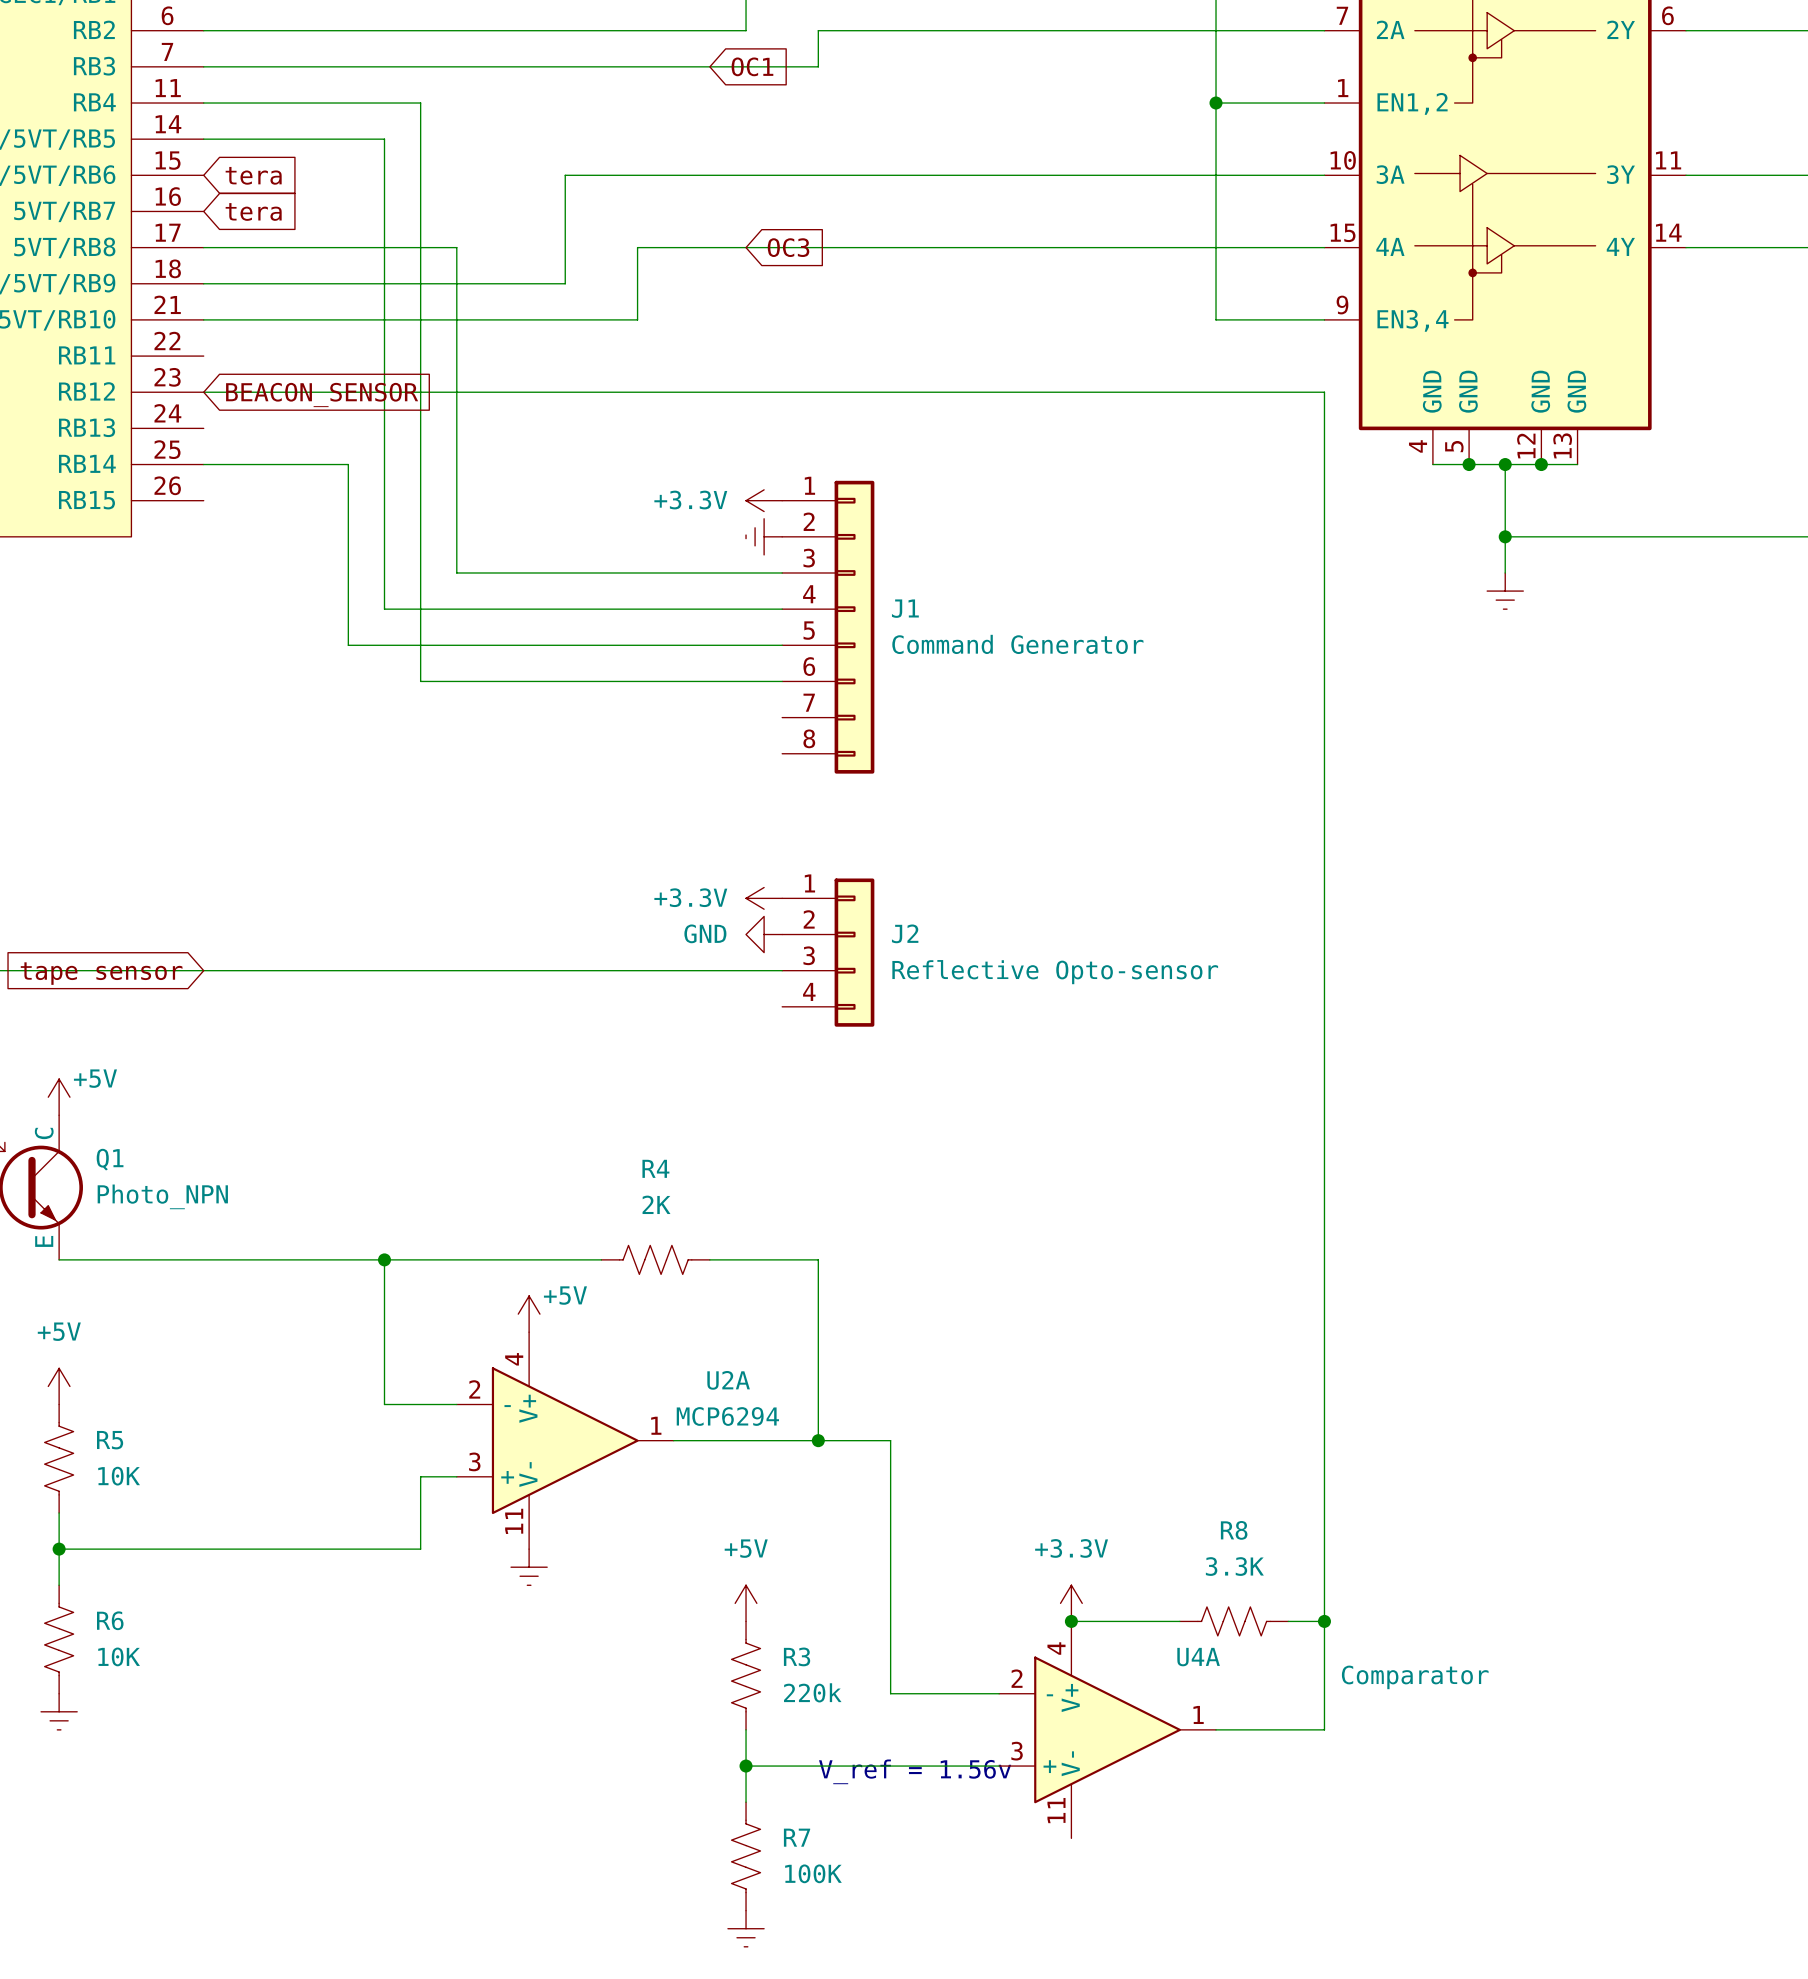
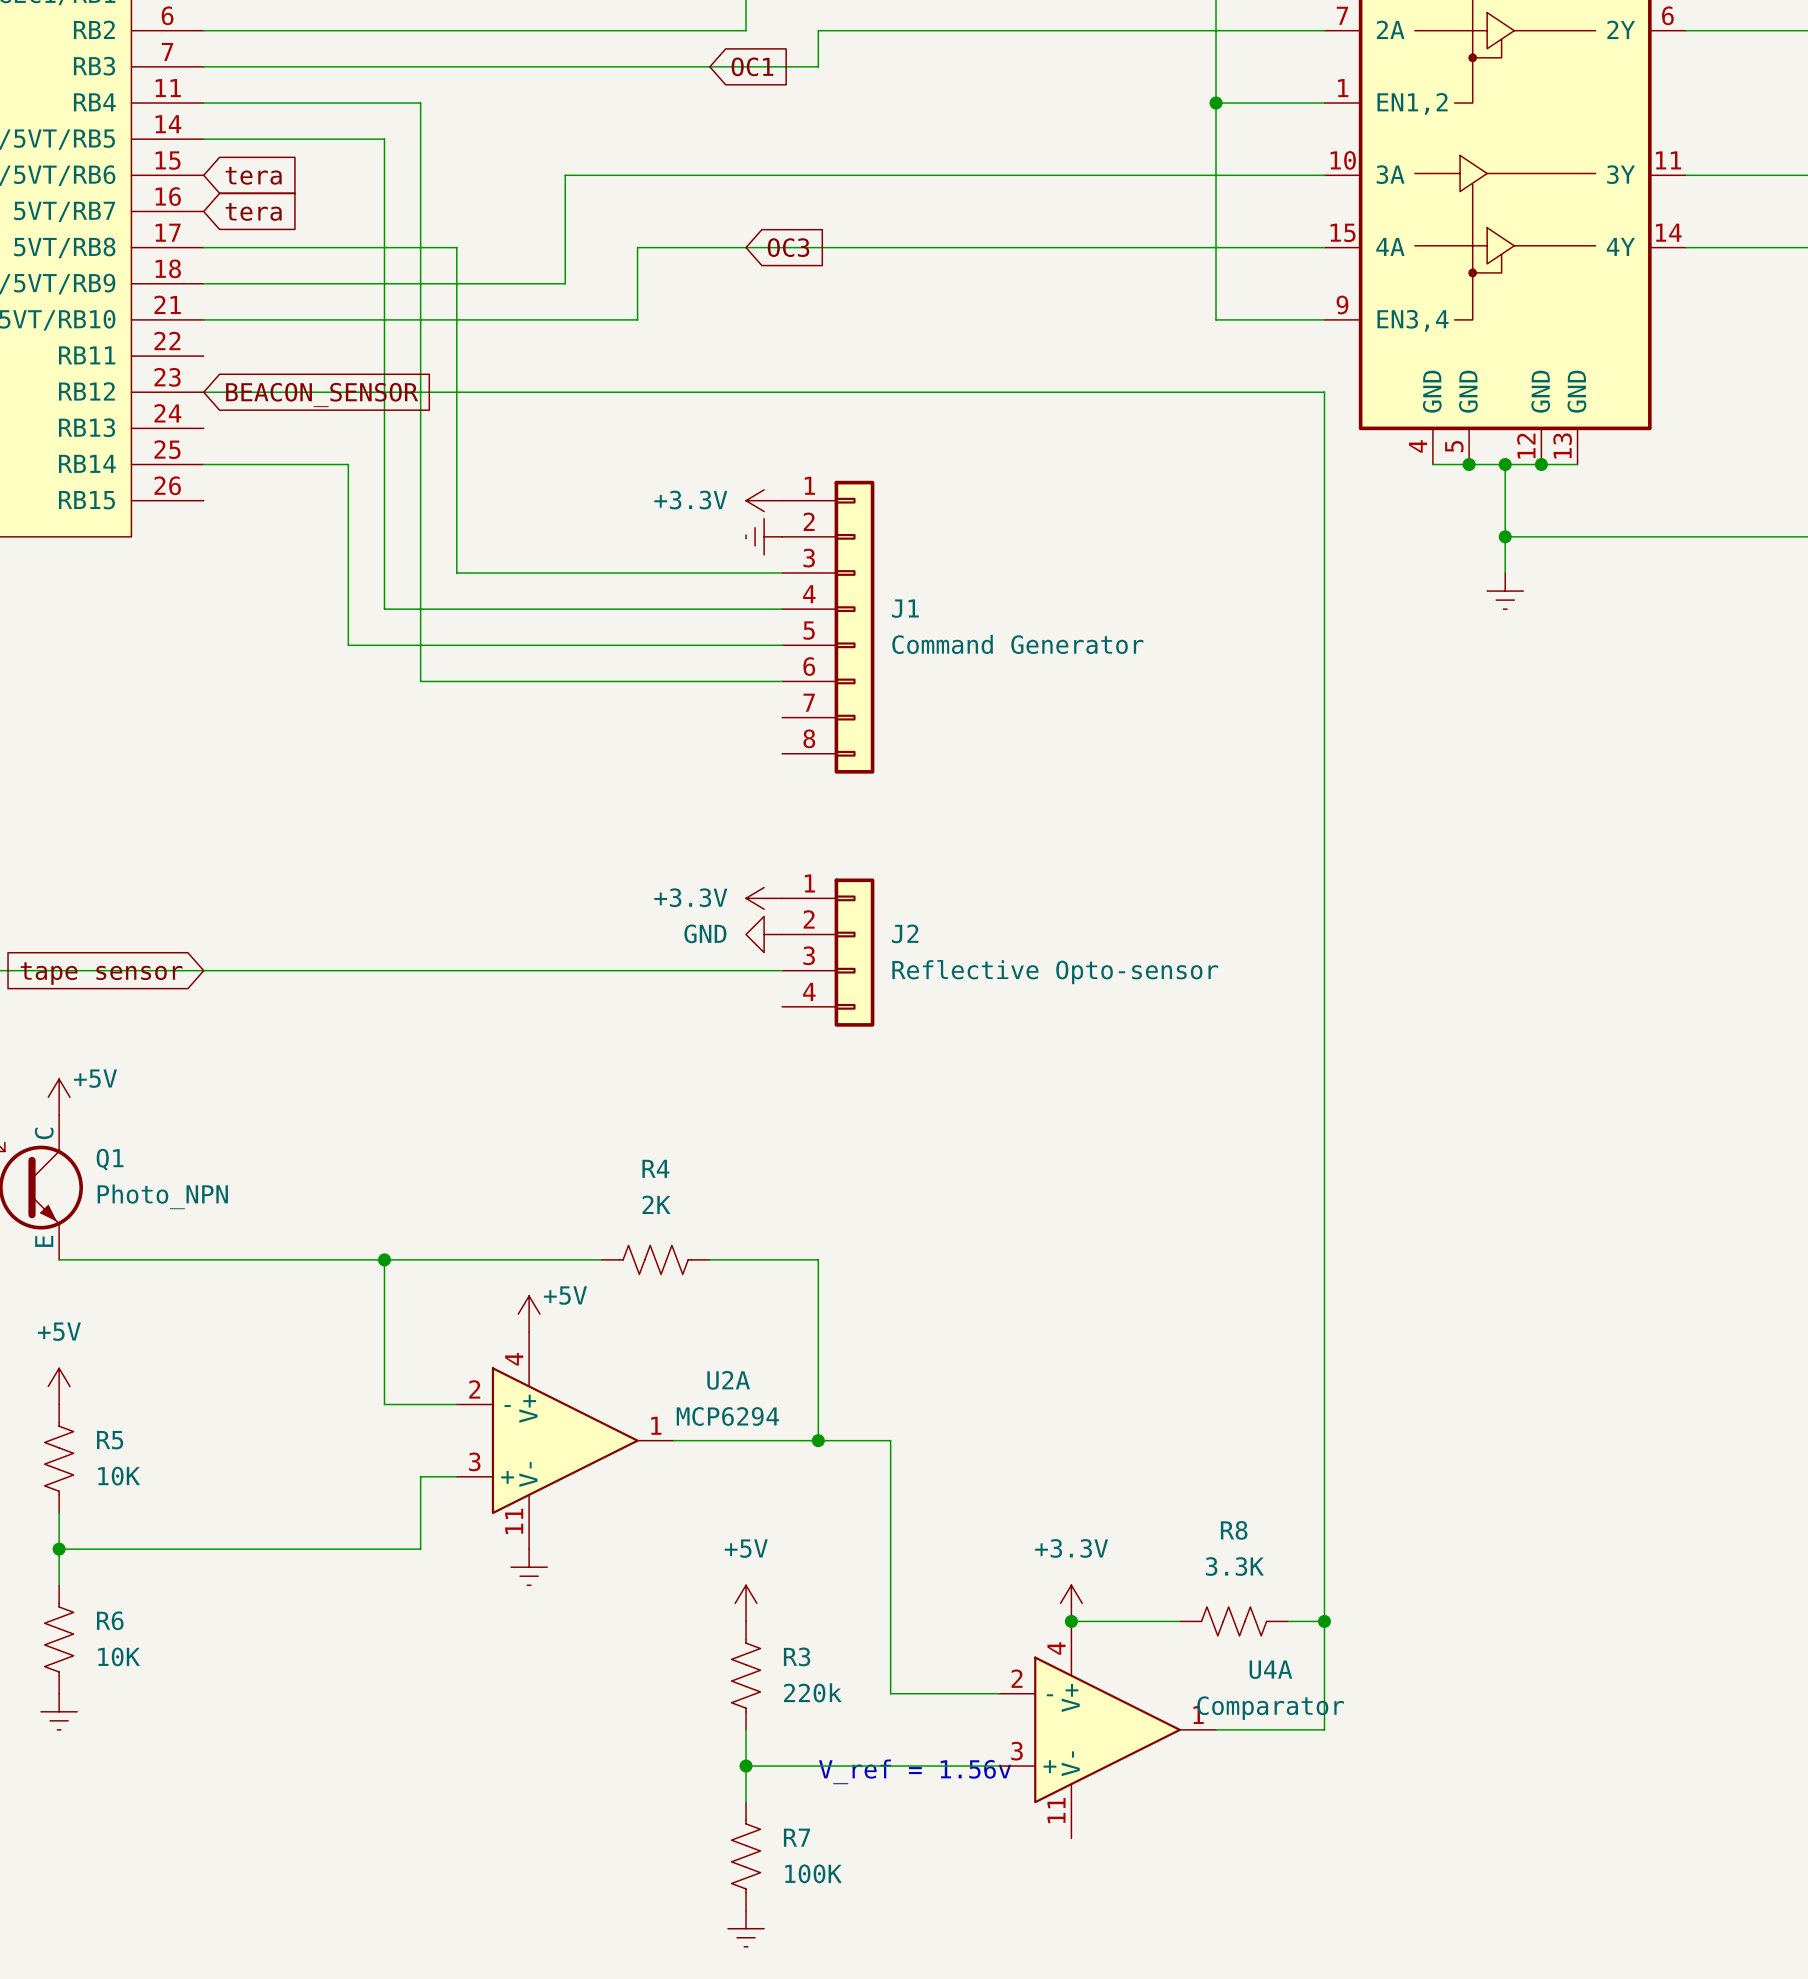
U4A name position: U4A (1198, 1657) -> U4A (1270, 1669)
U4A value position: Comparator (1415, 1677) -> Comparator (1270, 1708)

